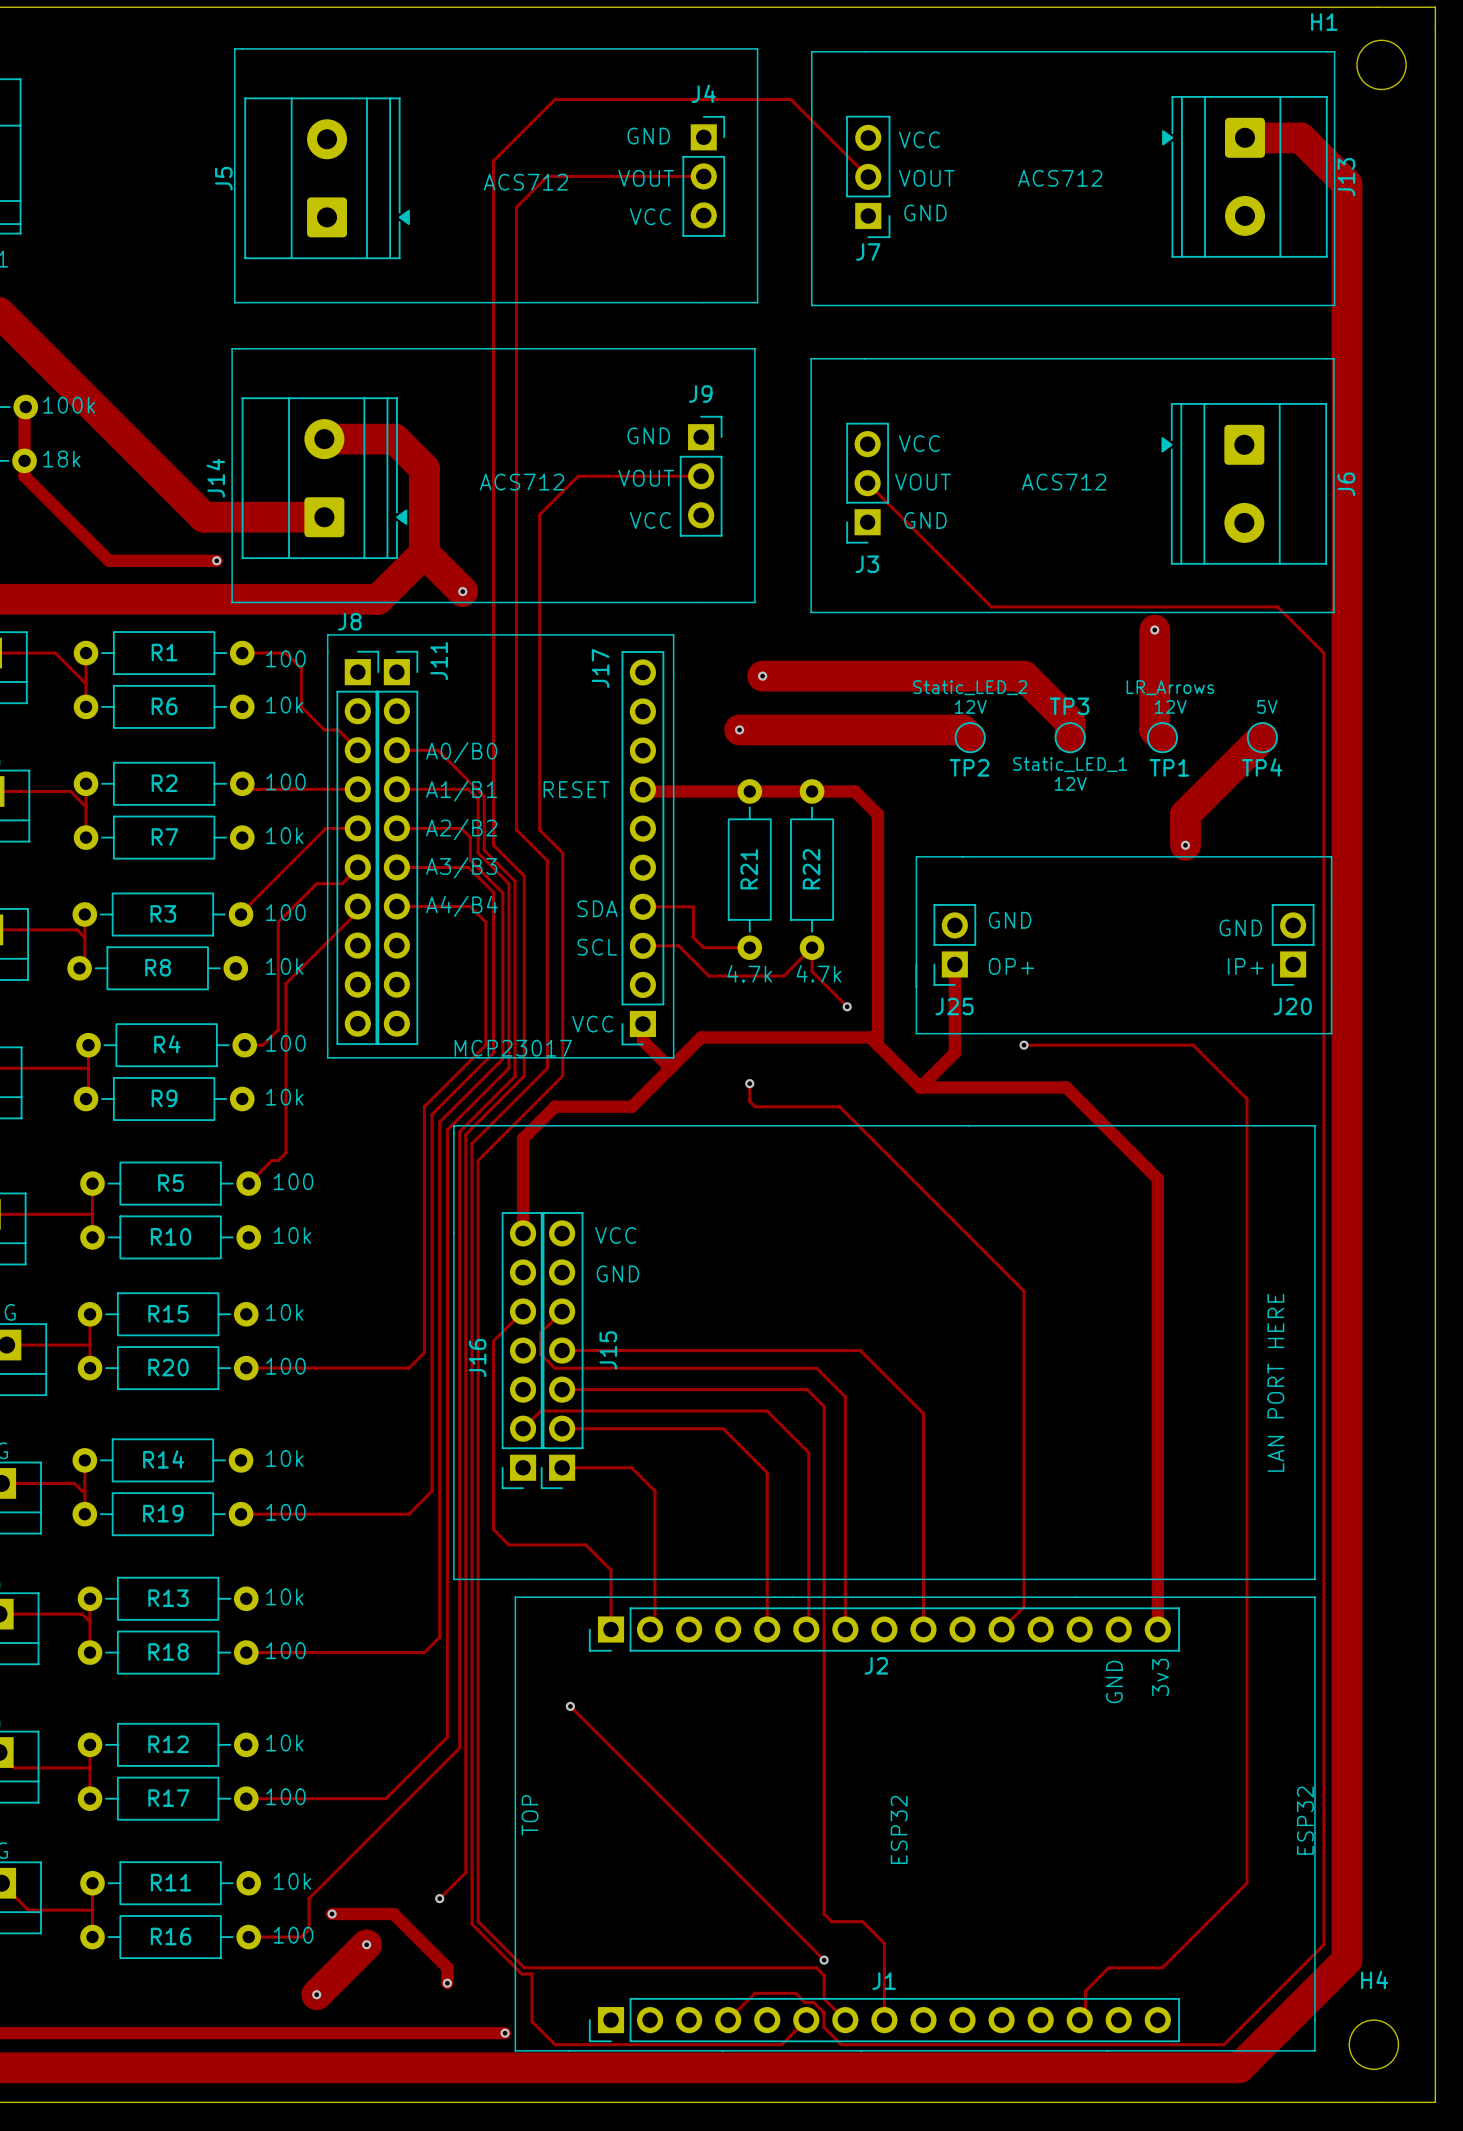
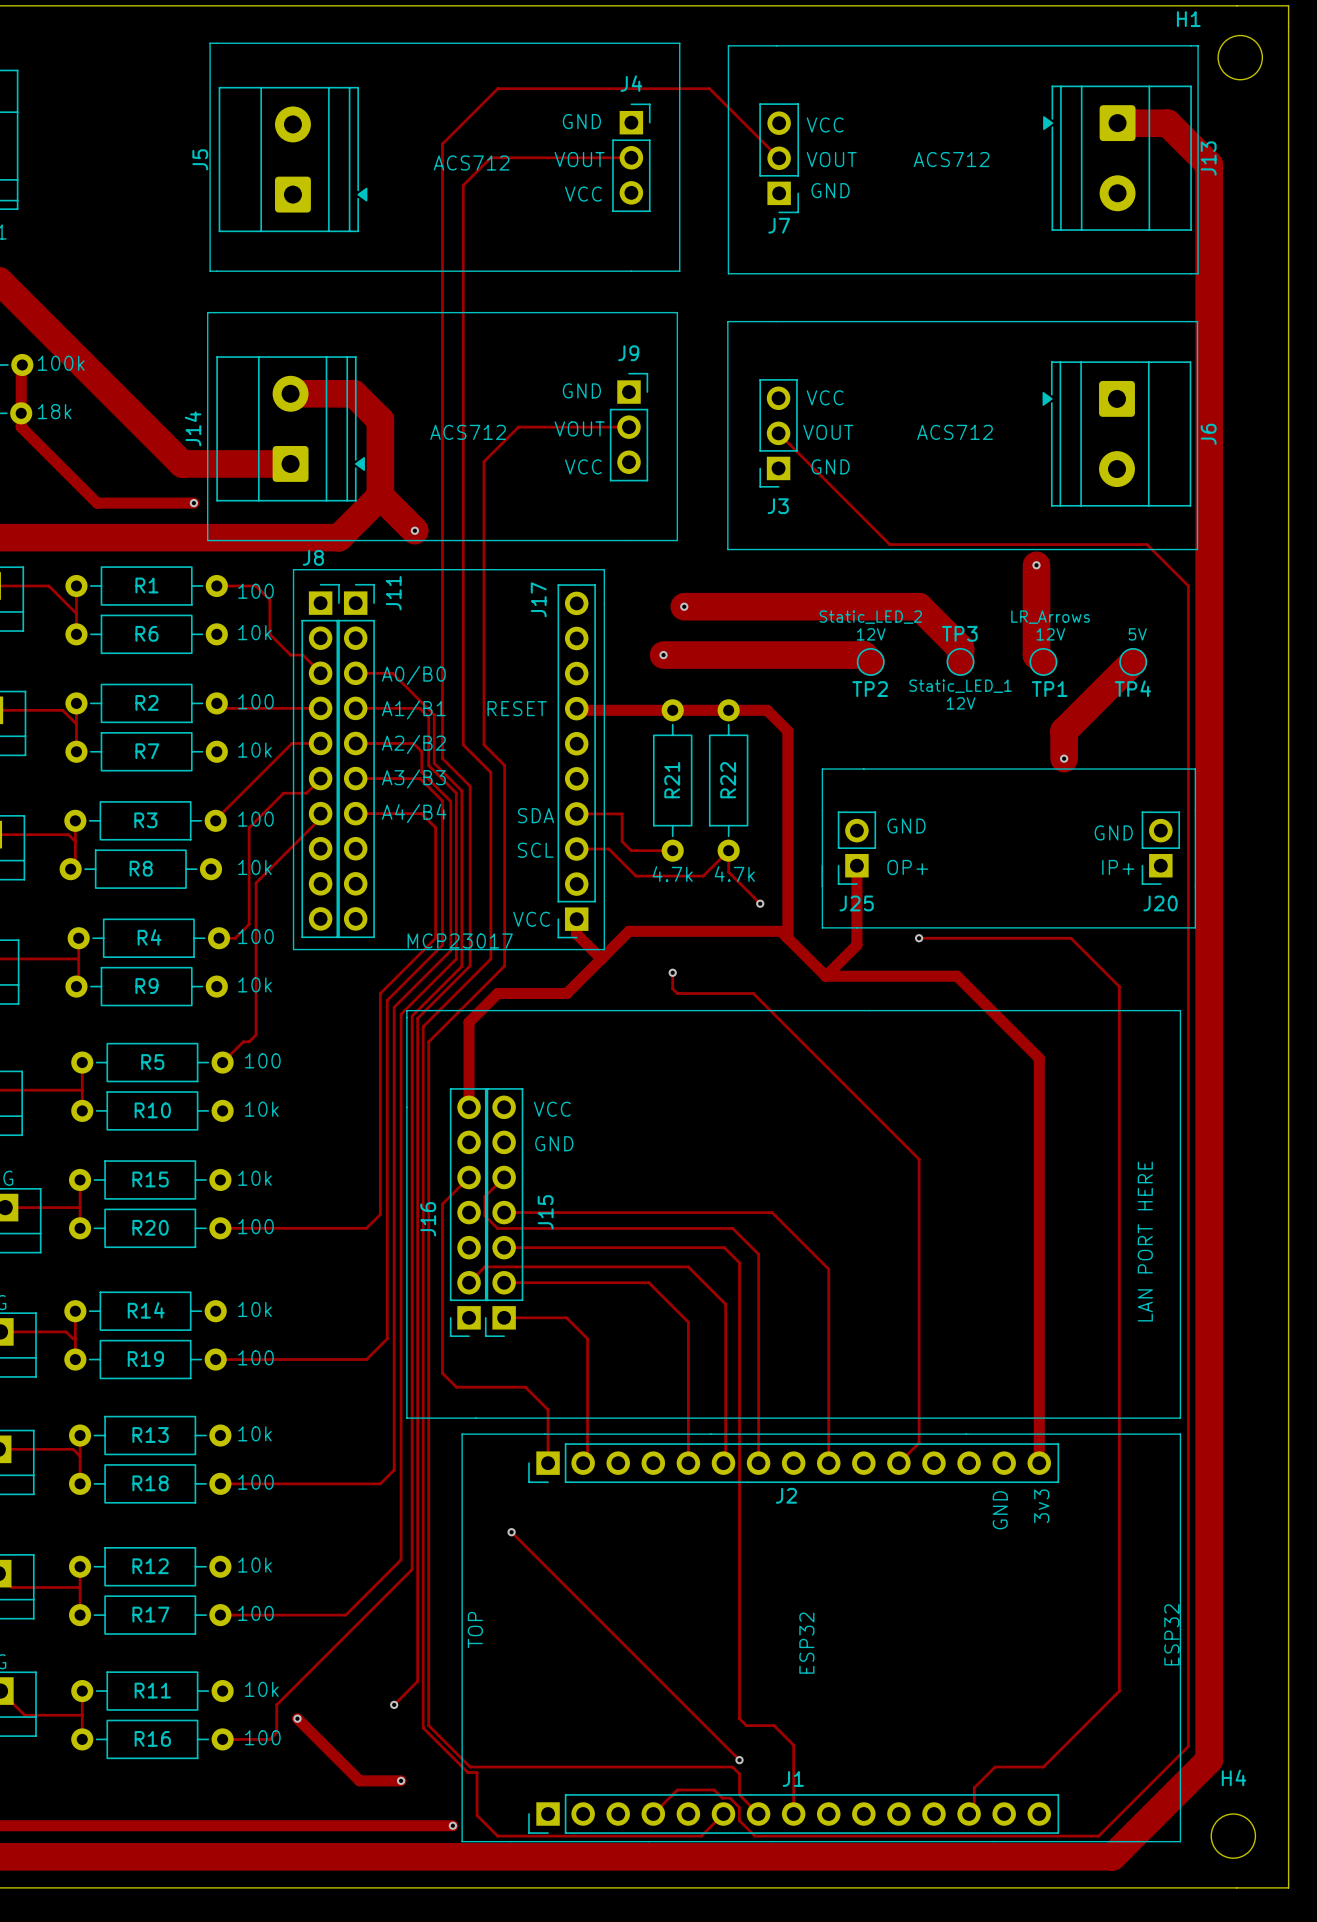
track: (332, 1913) (393, 1913) (447, 1967) (447, 1983) -> (297, 1718) (359, 1780) (401, 1780)
track: (366, 1944) (316, 1994) -> none
via: (366, 1944) -> none
via: (316, 1994) -> none

